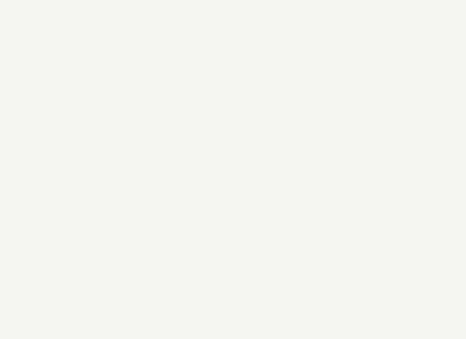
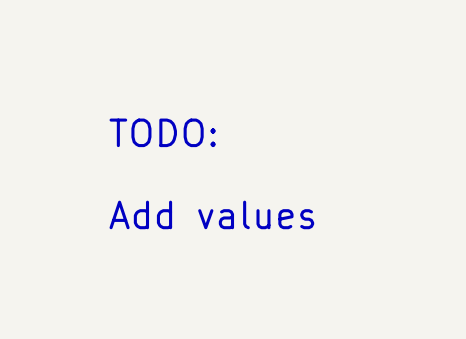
text: none -> TODO: (162, 132)
text: none -> Add values (211, 214)

